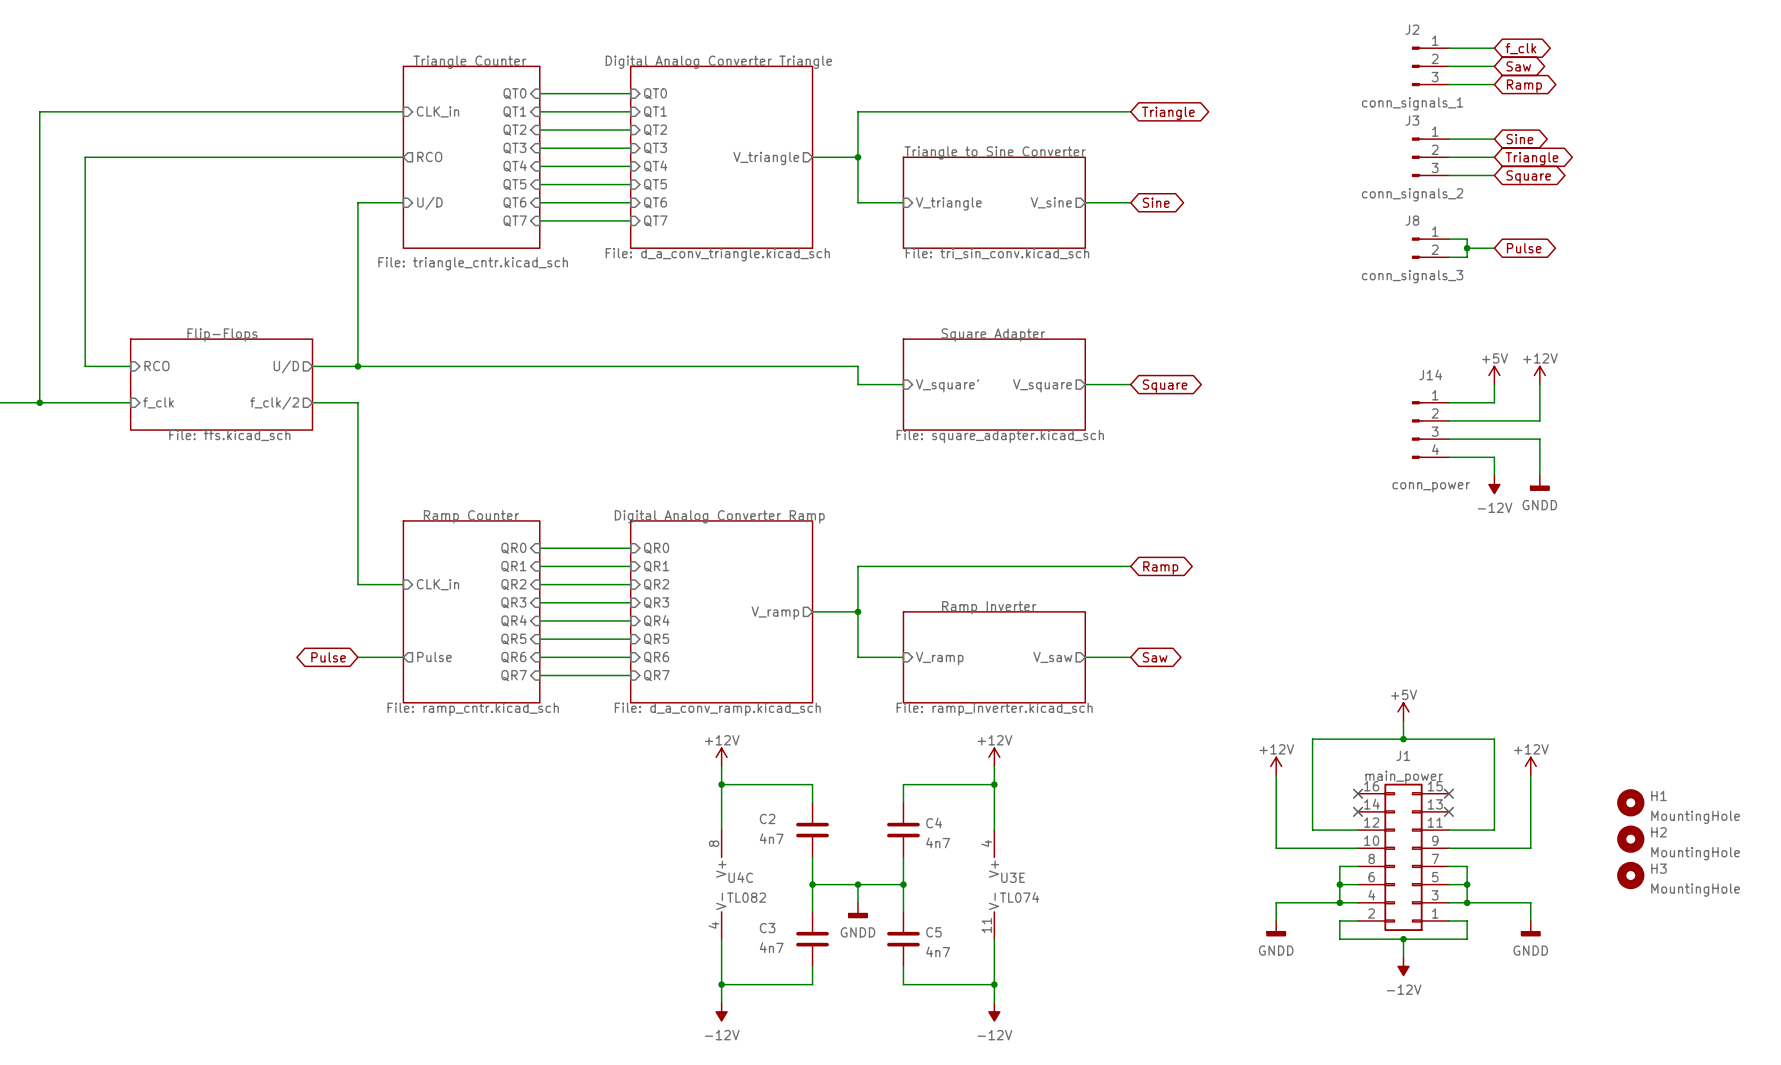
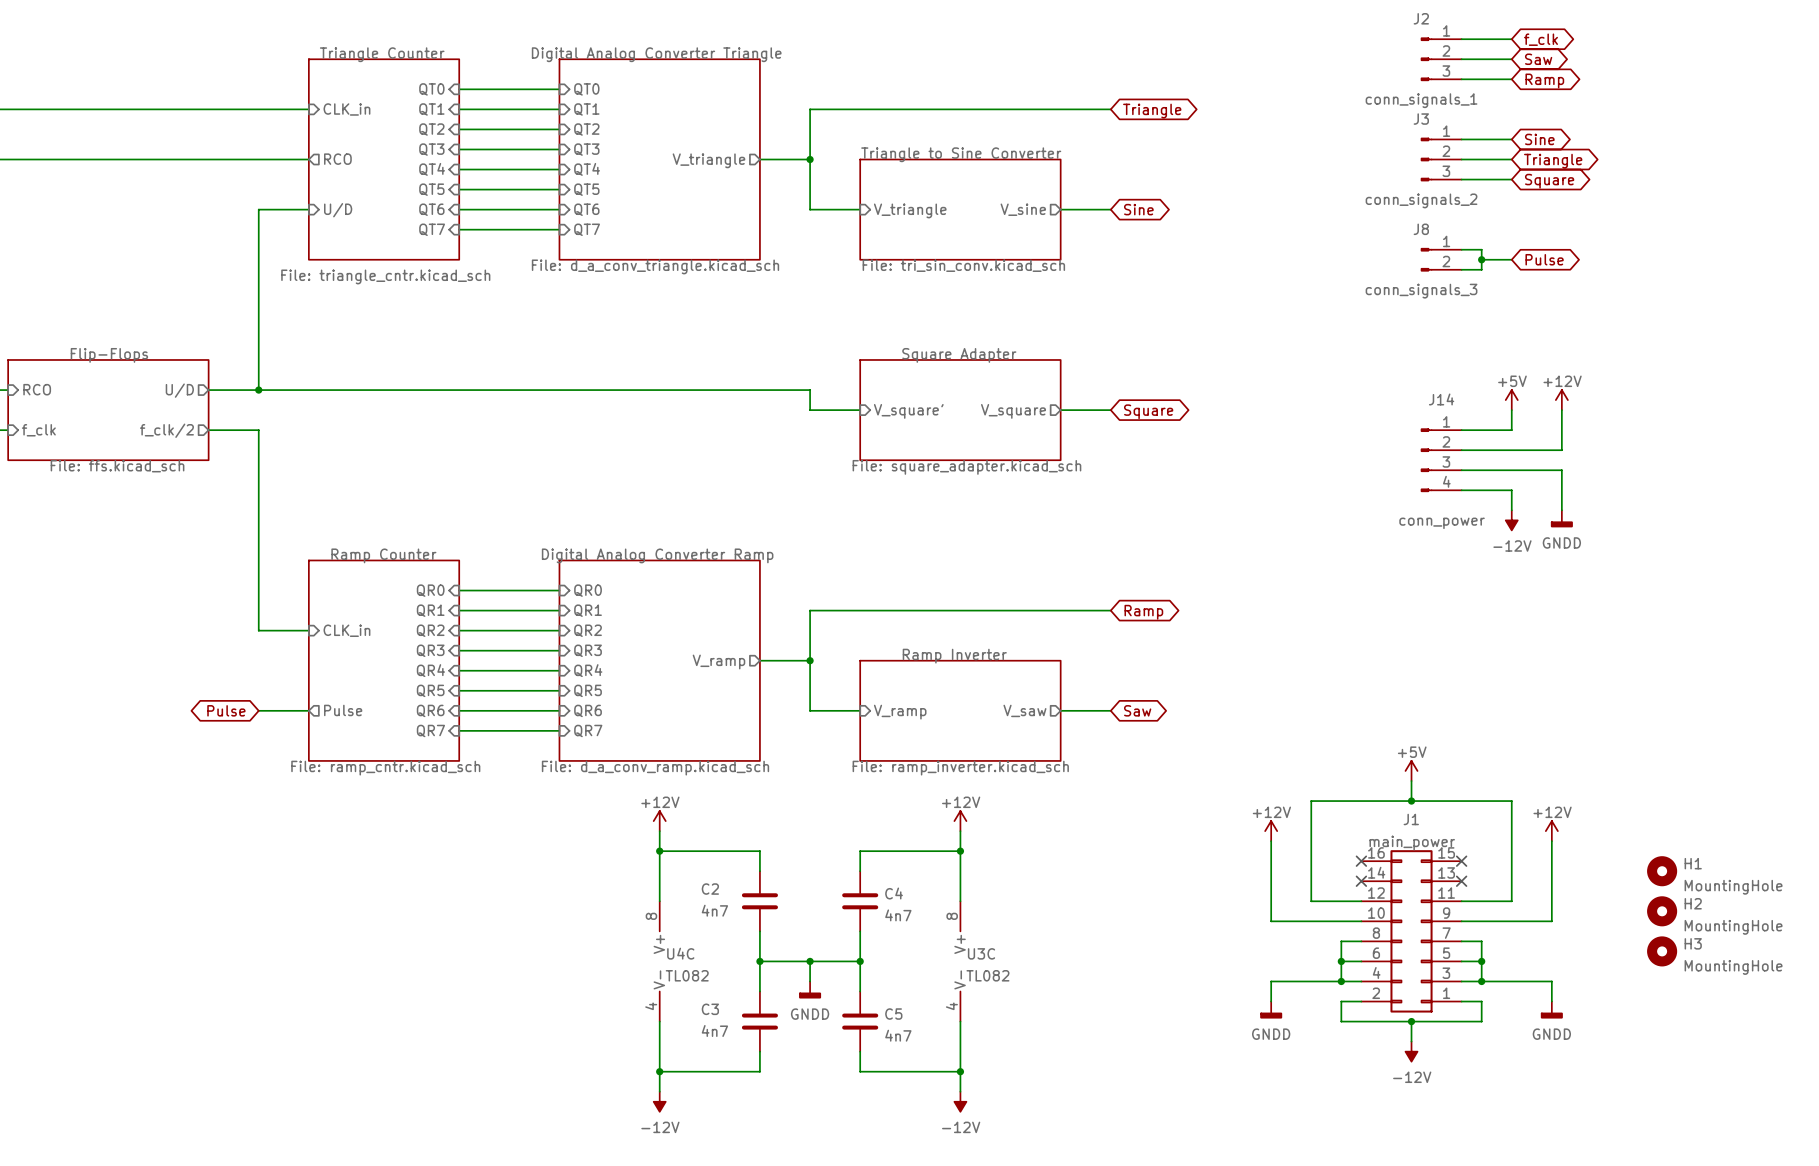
U3E pin number: 4 (986, 843) -> 8 (952, 916)
U3E name: U3E (1013, 877) -> U3C (981, 953)
U3E value: TL074 (1019, 897) -> TL082 (987, 975)
U3E pin number: 11 (986, 925) -> 4 (951, 1006)

